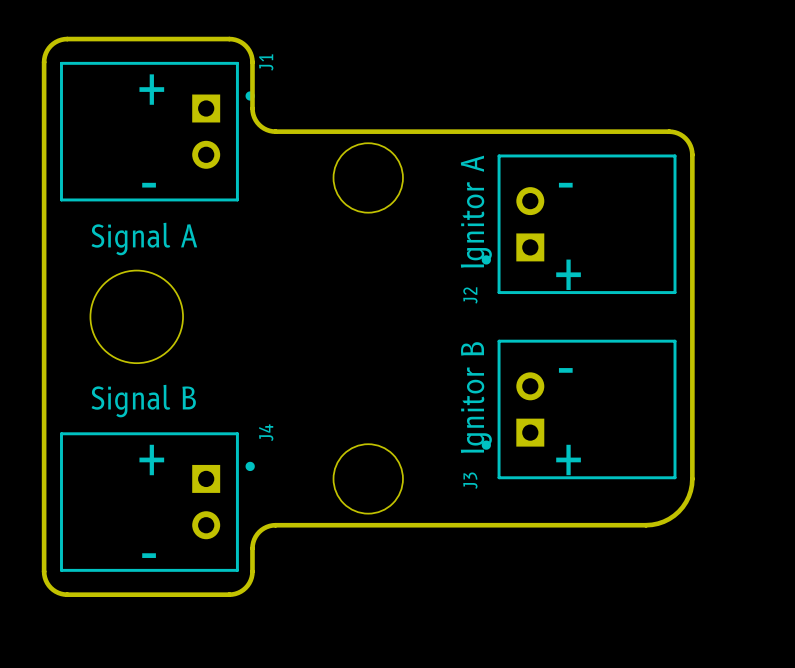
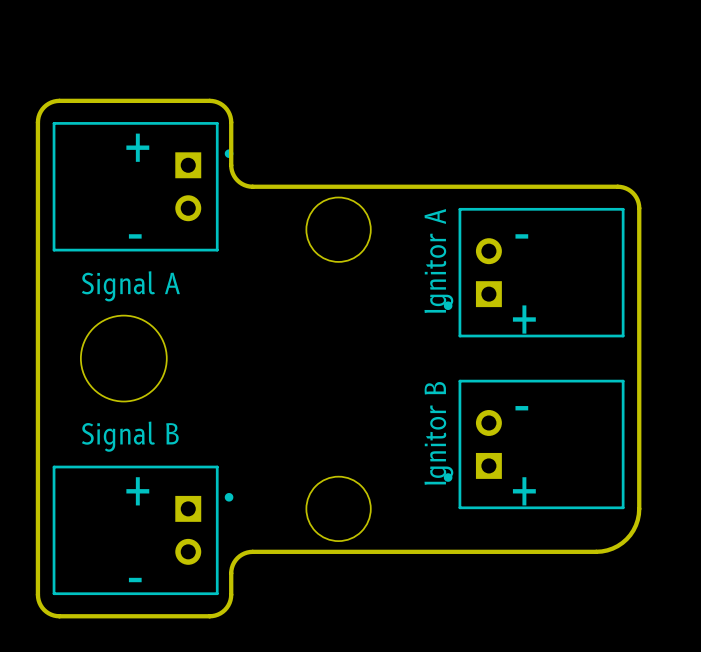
J1 name: J1 (266, 62) -> none
J2 name: J2 (470, 295) -> none
J4 name: J4 (266, 432) -> none
J3 name: J3 (470, 480) -> none

